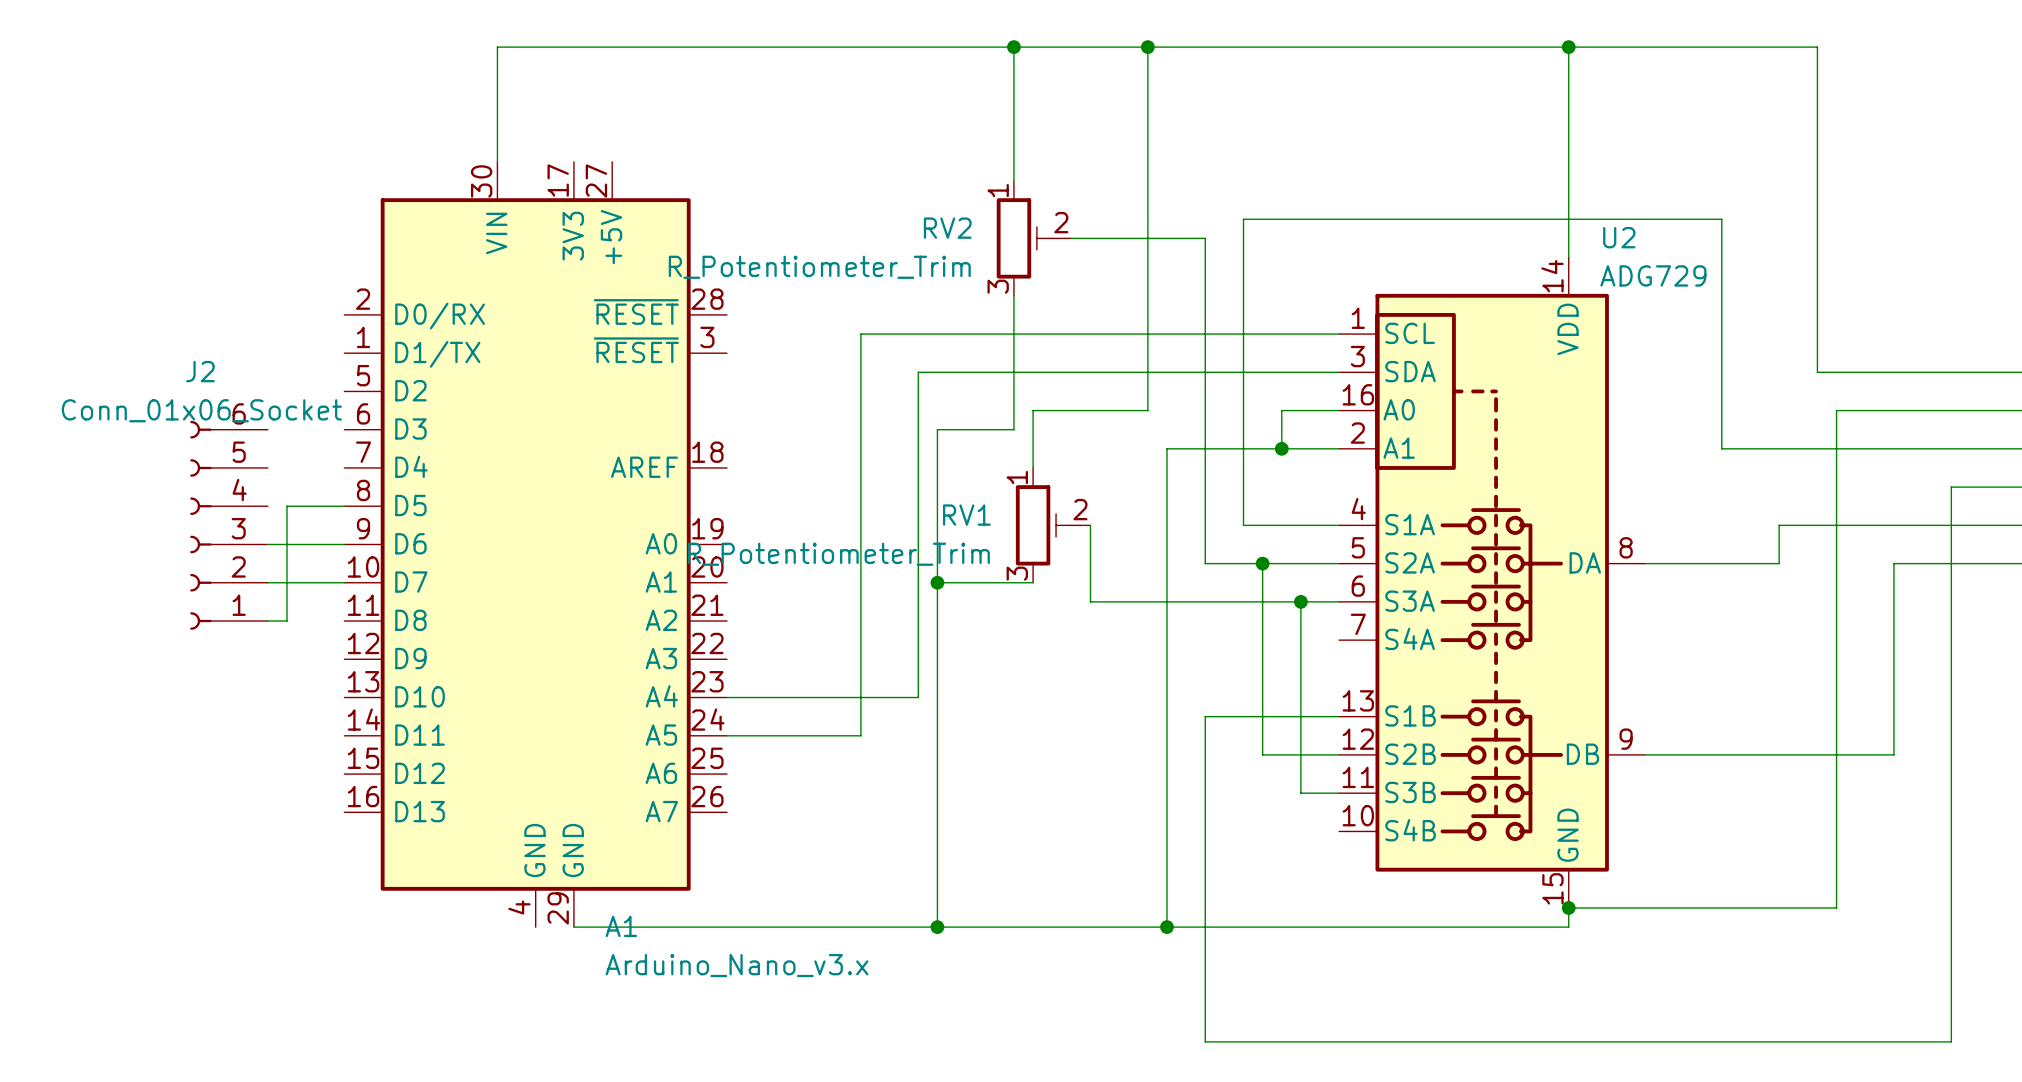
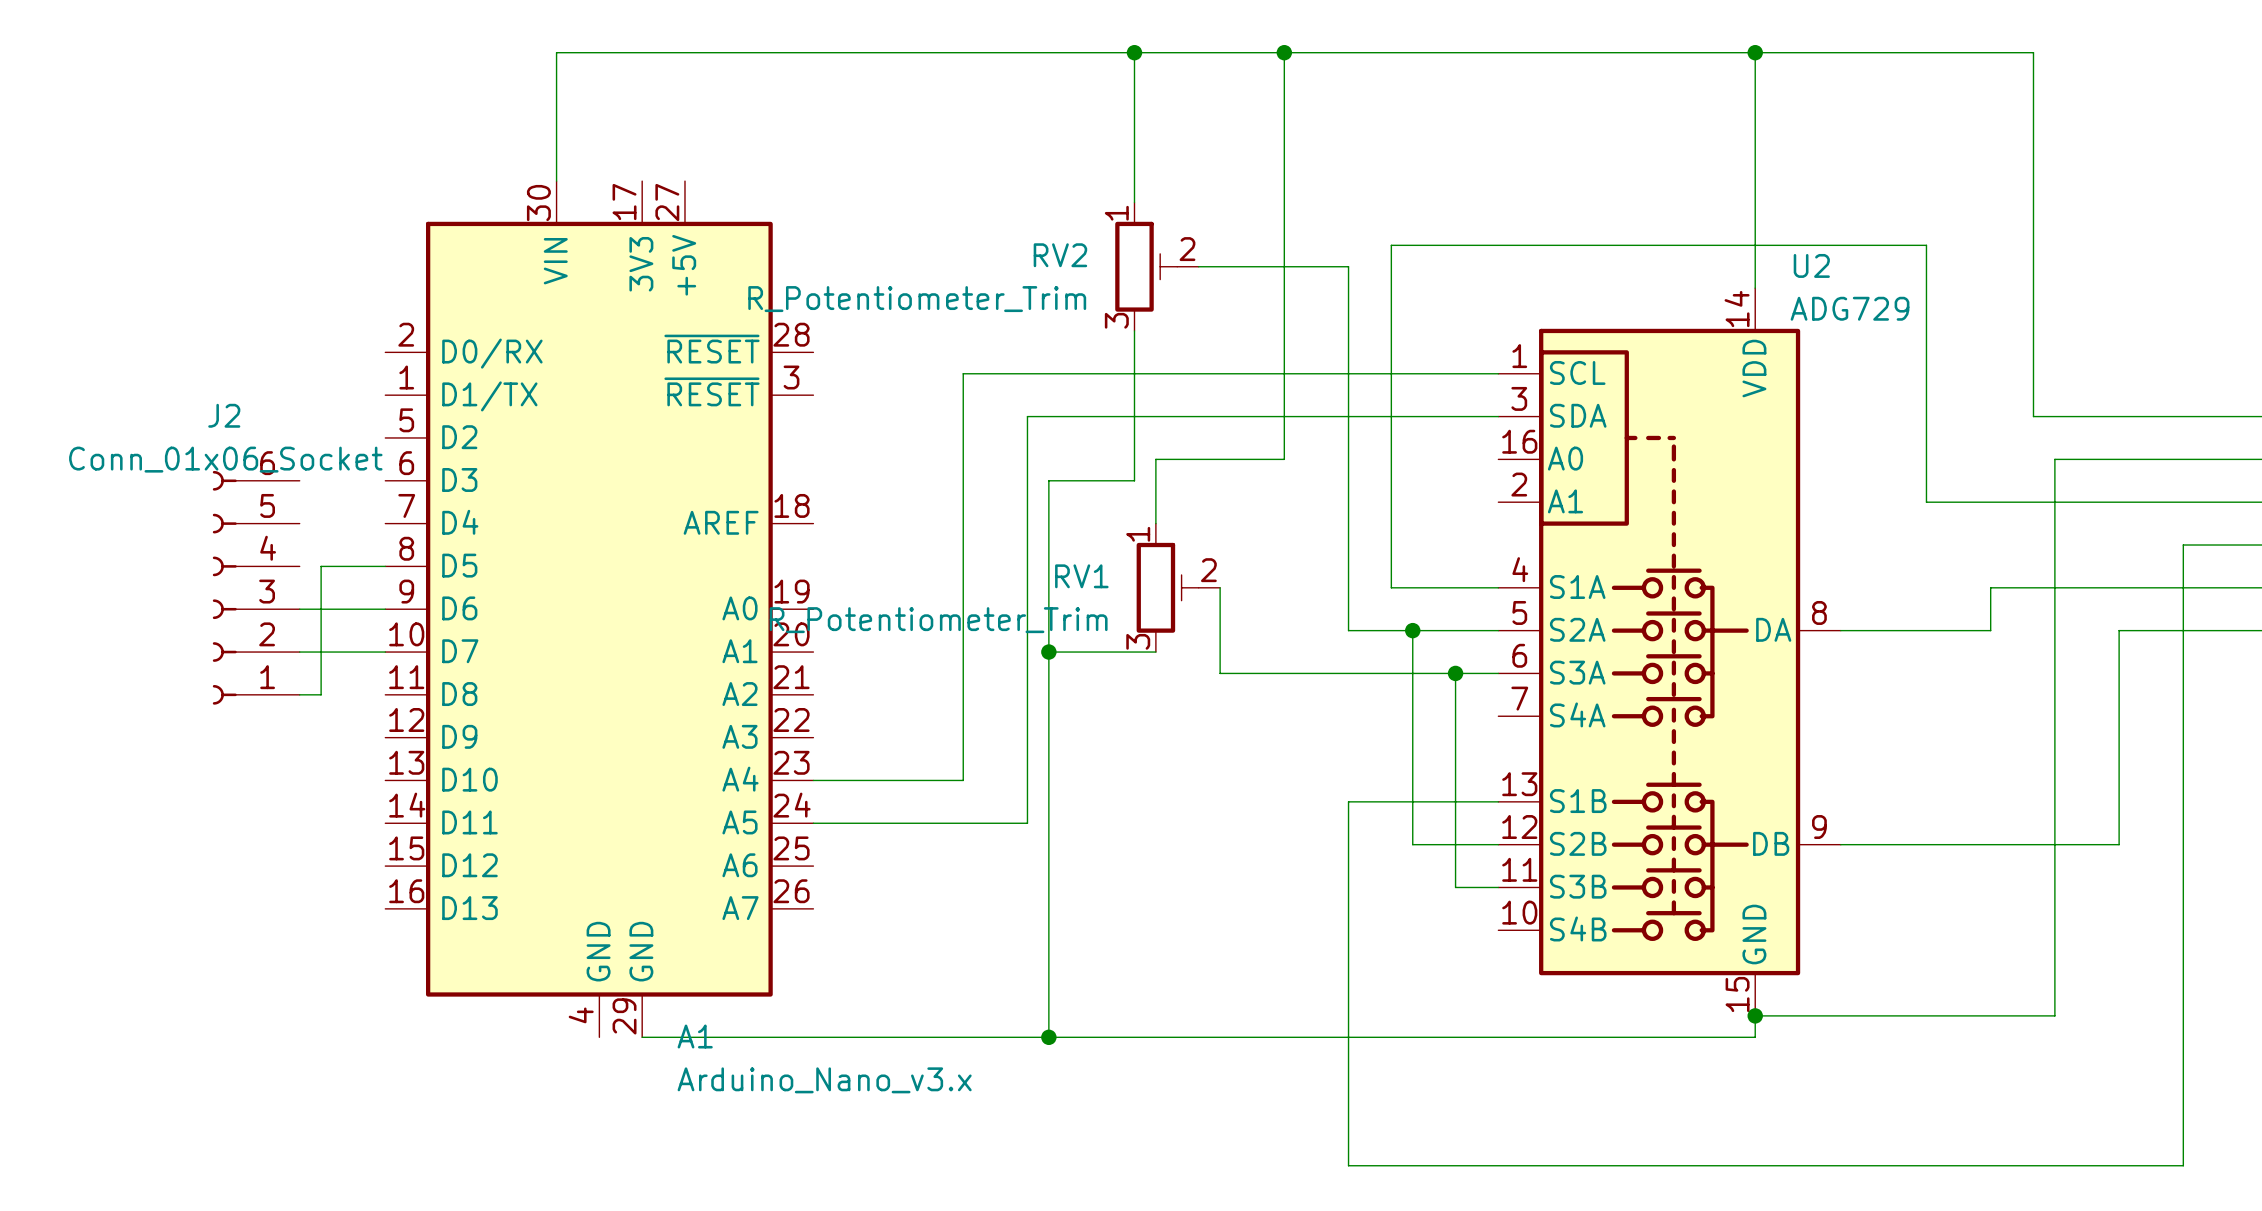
wire: (1339, 410) (1281, 410) (1281, 448) -> none
junction: (1281, 448) -> none
wire: (1339, 448) (1166, 448) (1166, 927) -> none
wire: (918, 697) (860, 697) (860, 735) -> (1027, 780) (1027, 823) (963, 823)
junction: (1166, 927) -> none

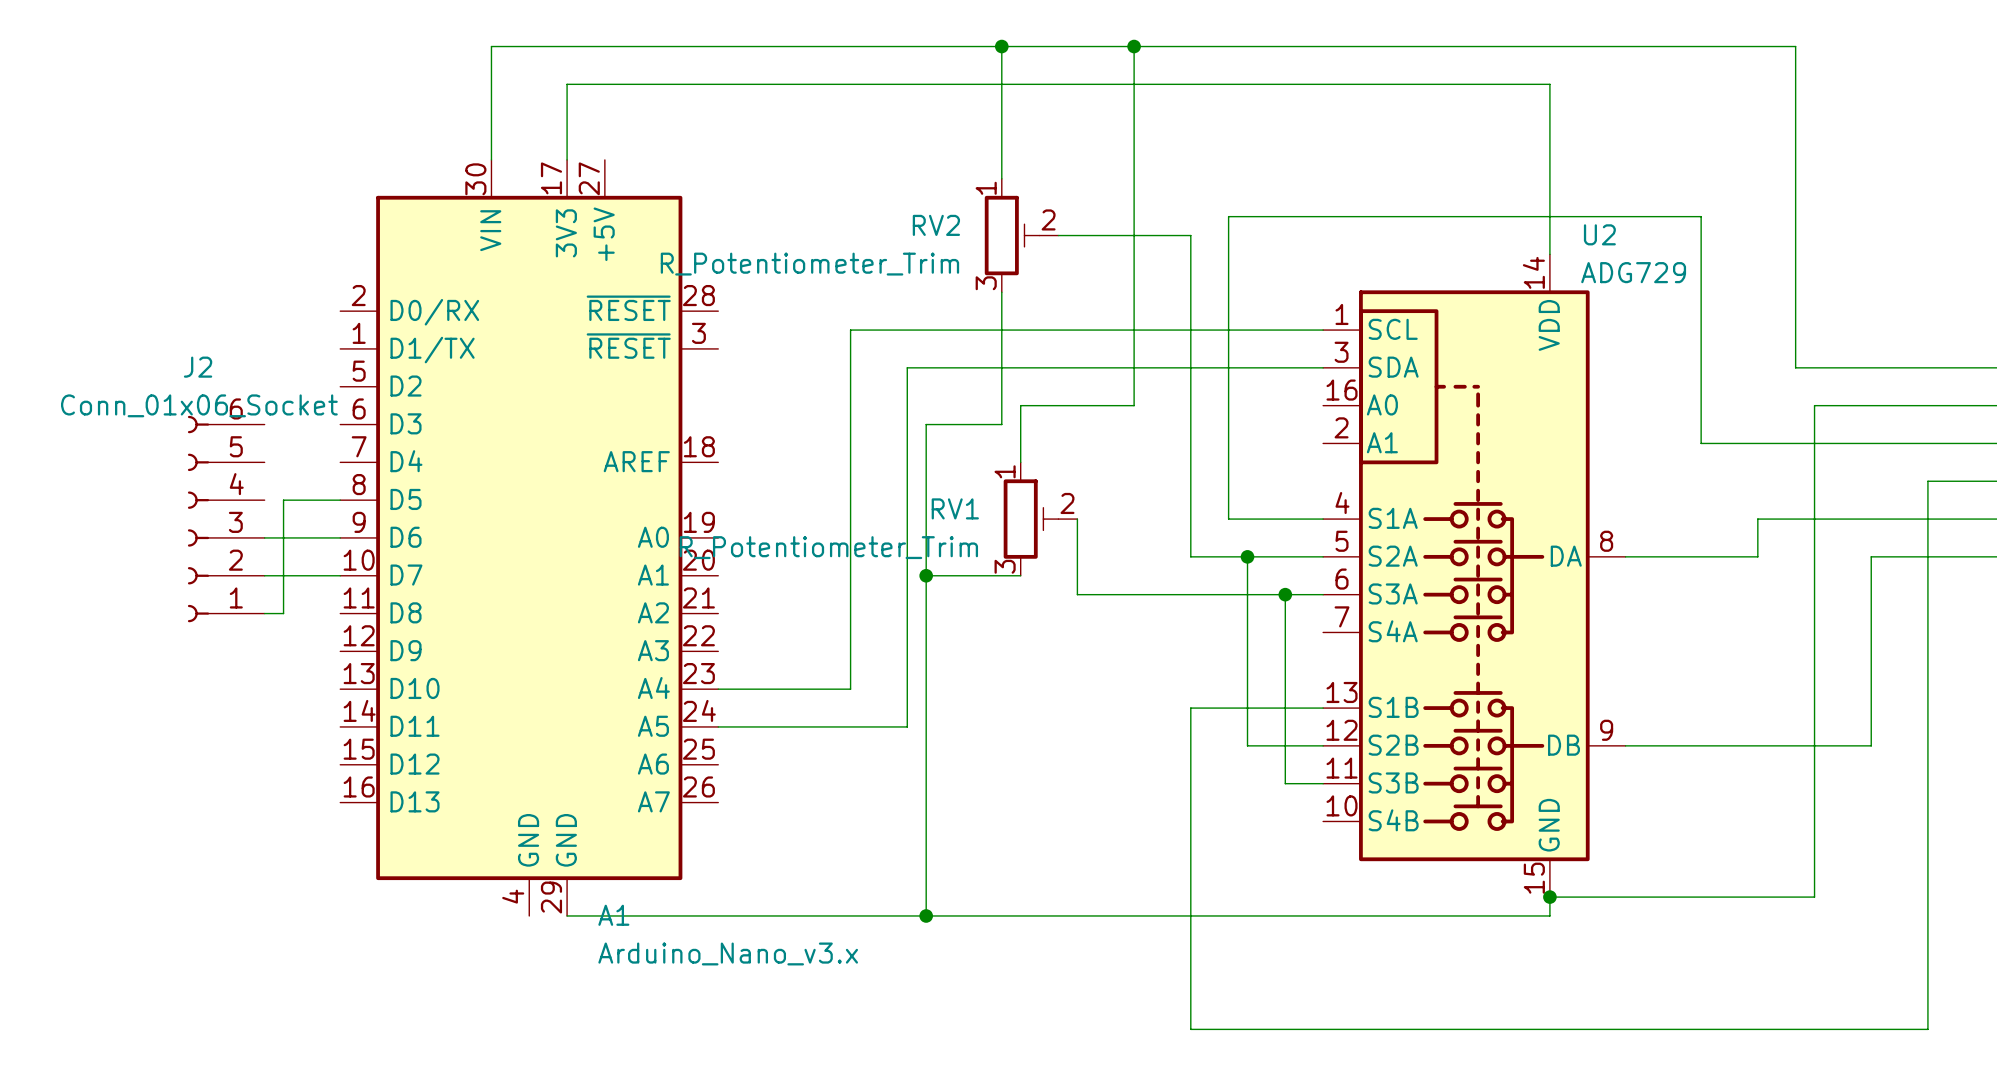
wire: (1755, 52) (1755, 95) -> (567, 159) (567, 84) (1549, 84)
junction: (1755, 52) -> none

